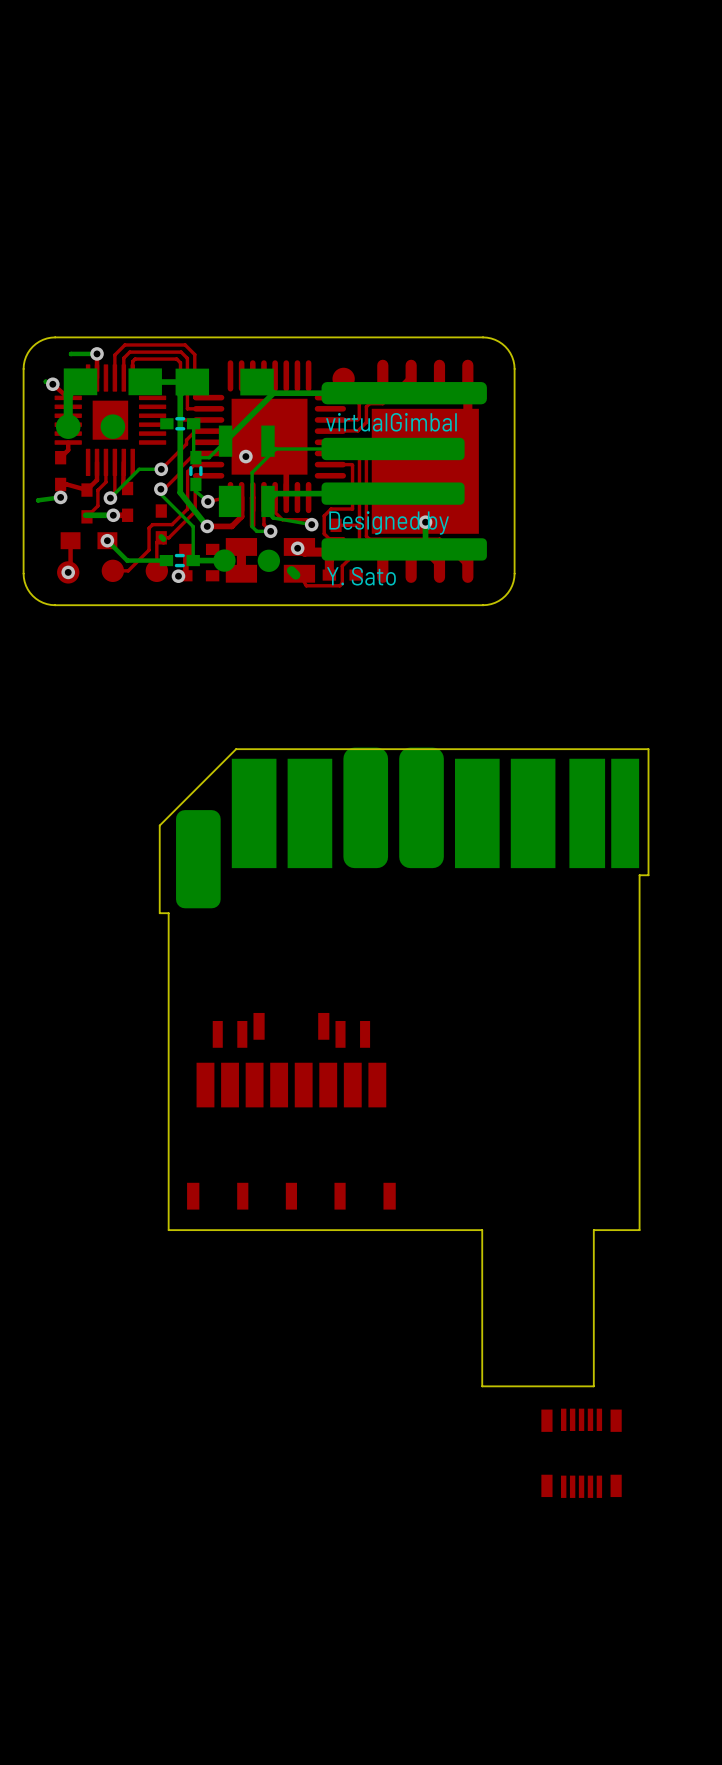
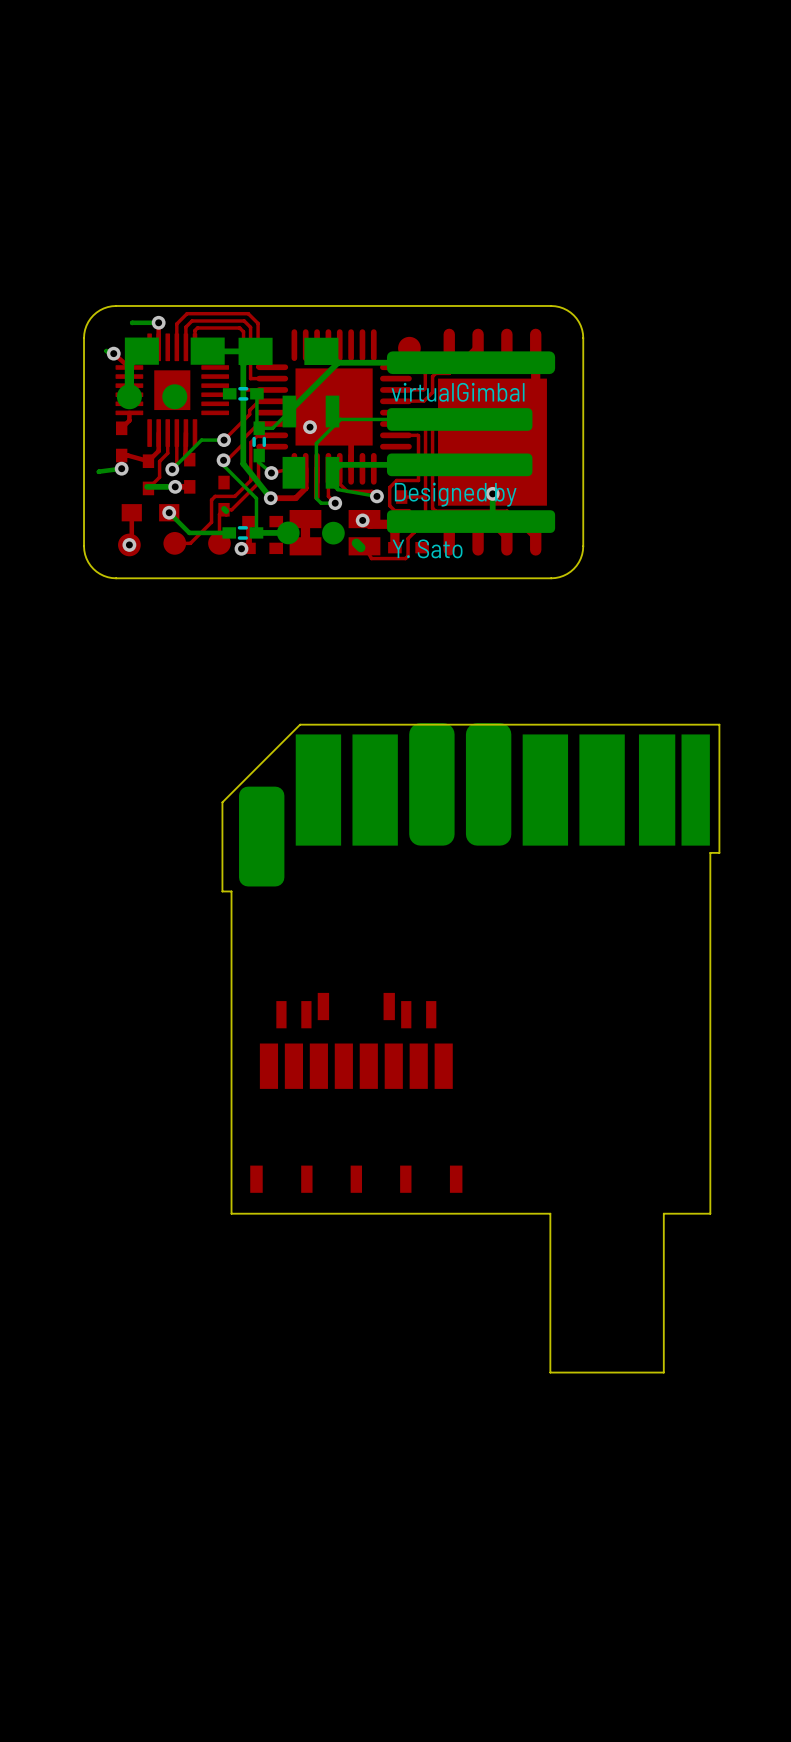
part: (581, 1453) -> none

